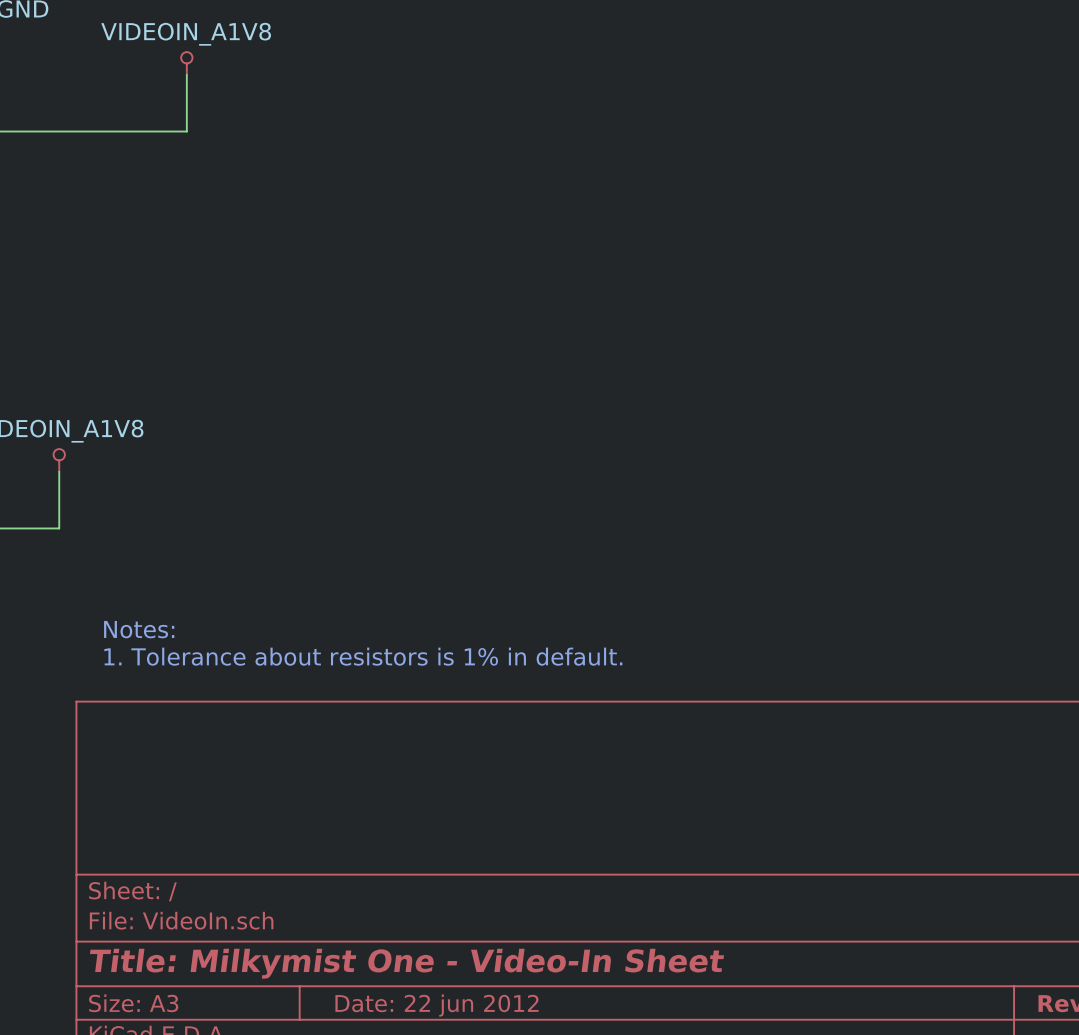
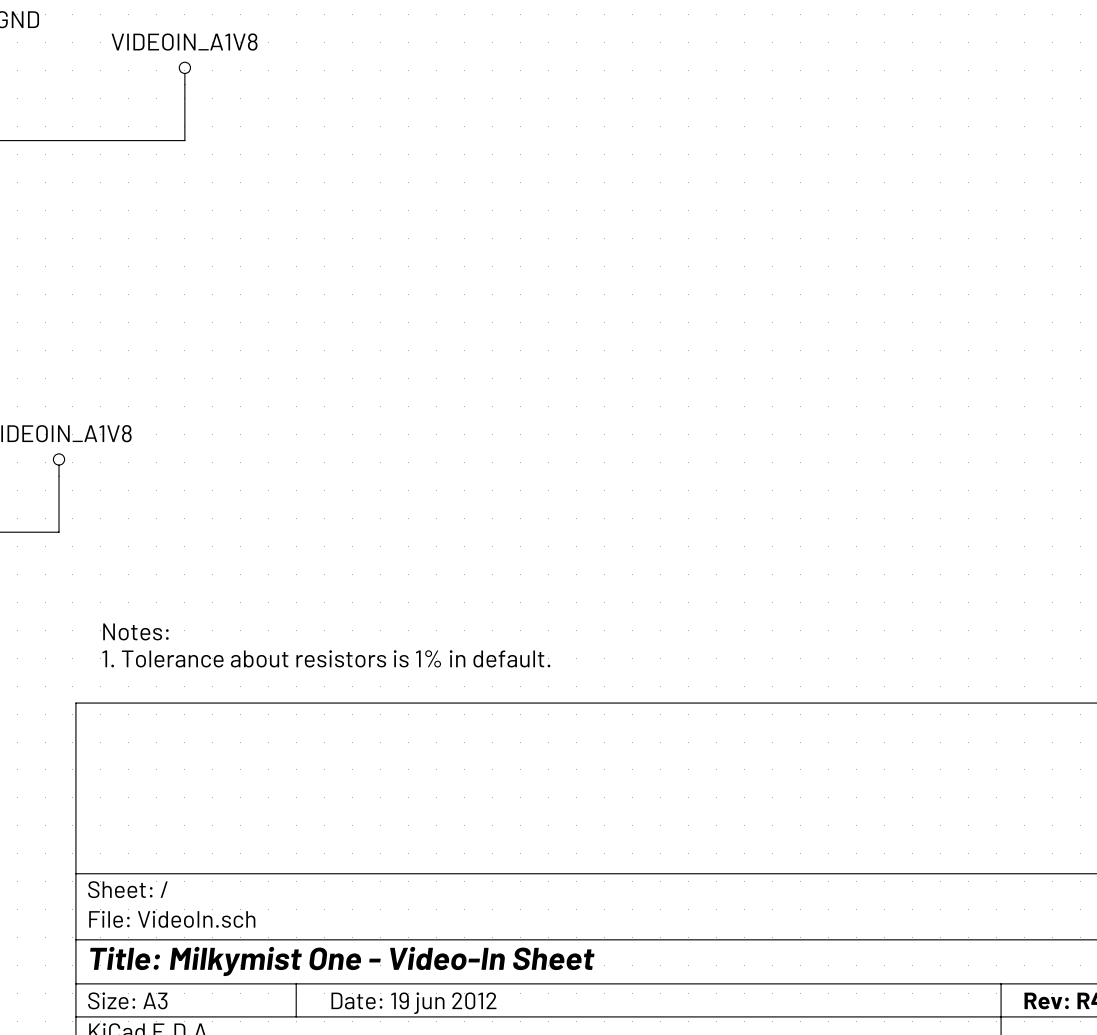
title block: Date: 22 jun 2012 (436, 1005) -> Date: 19 jun 2012 (413, 1003)

